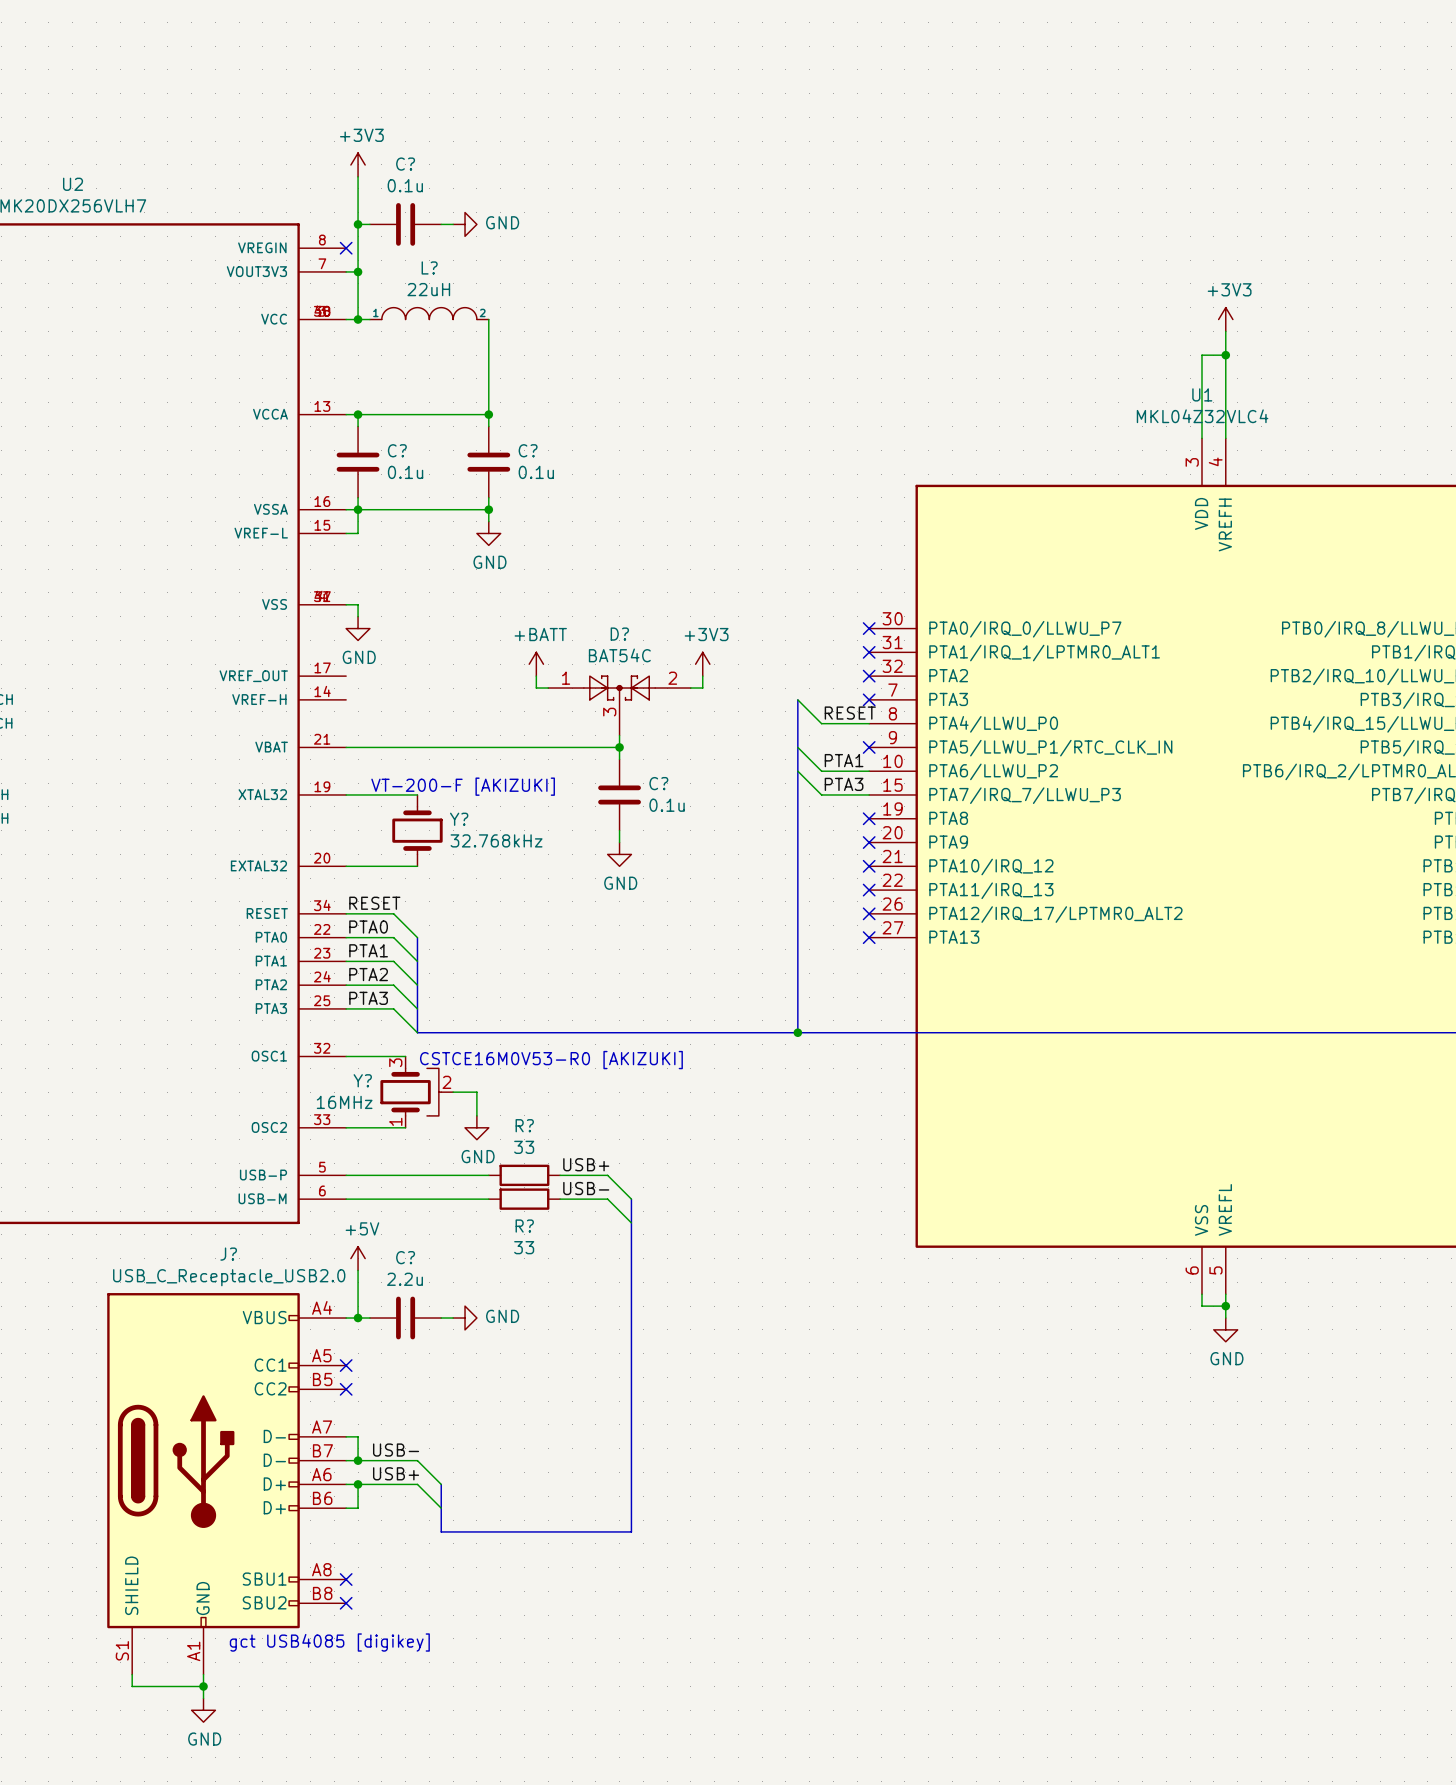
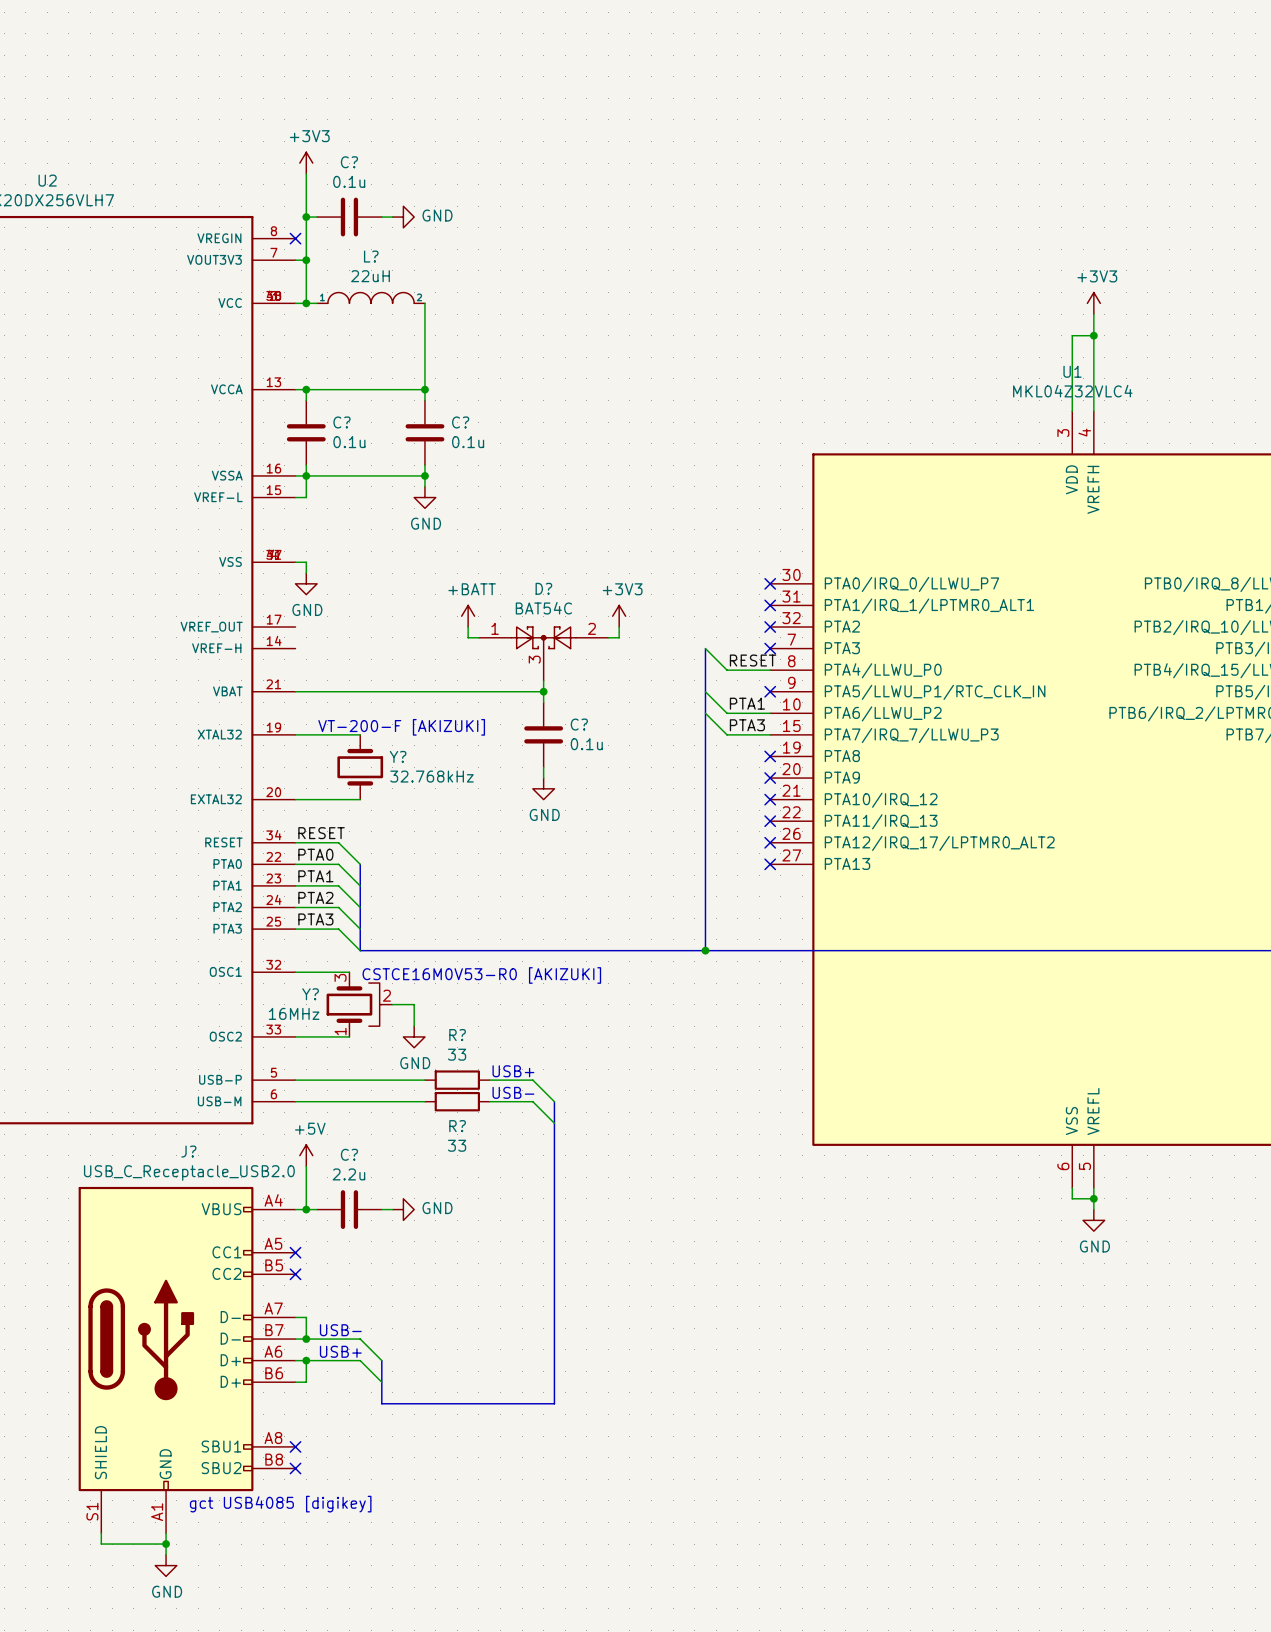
label: USB+ (586, 1164) -> none
text: none -> USB+ (513, 1071)
label: USB- (586, 1188) -> none
text: none -> USB- (513, 1092)
label: USB- (396, 1450) -> none
text: none -> USB- (340, 1330)
label: USB+ (396, 1473) -> none
text: none -> USB+ (340, 1351)

